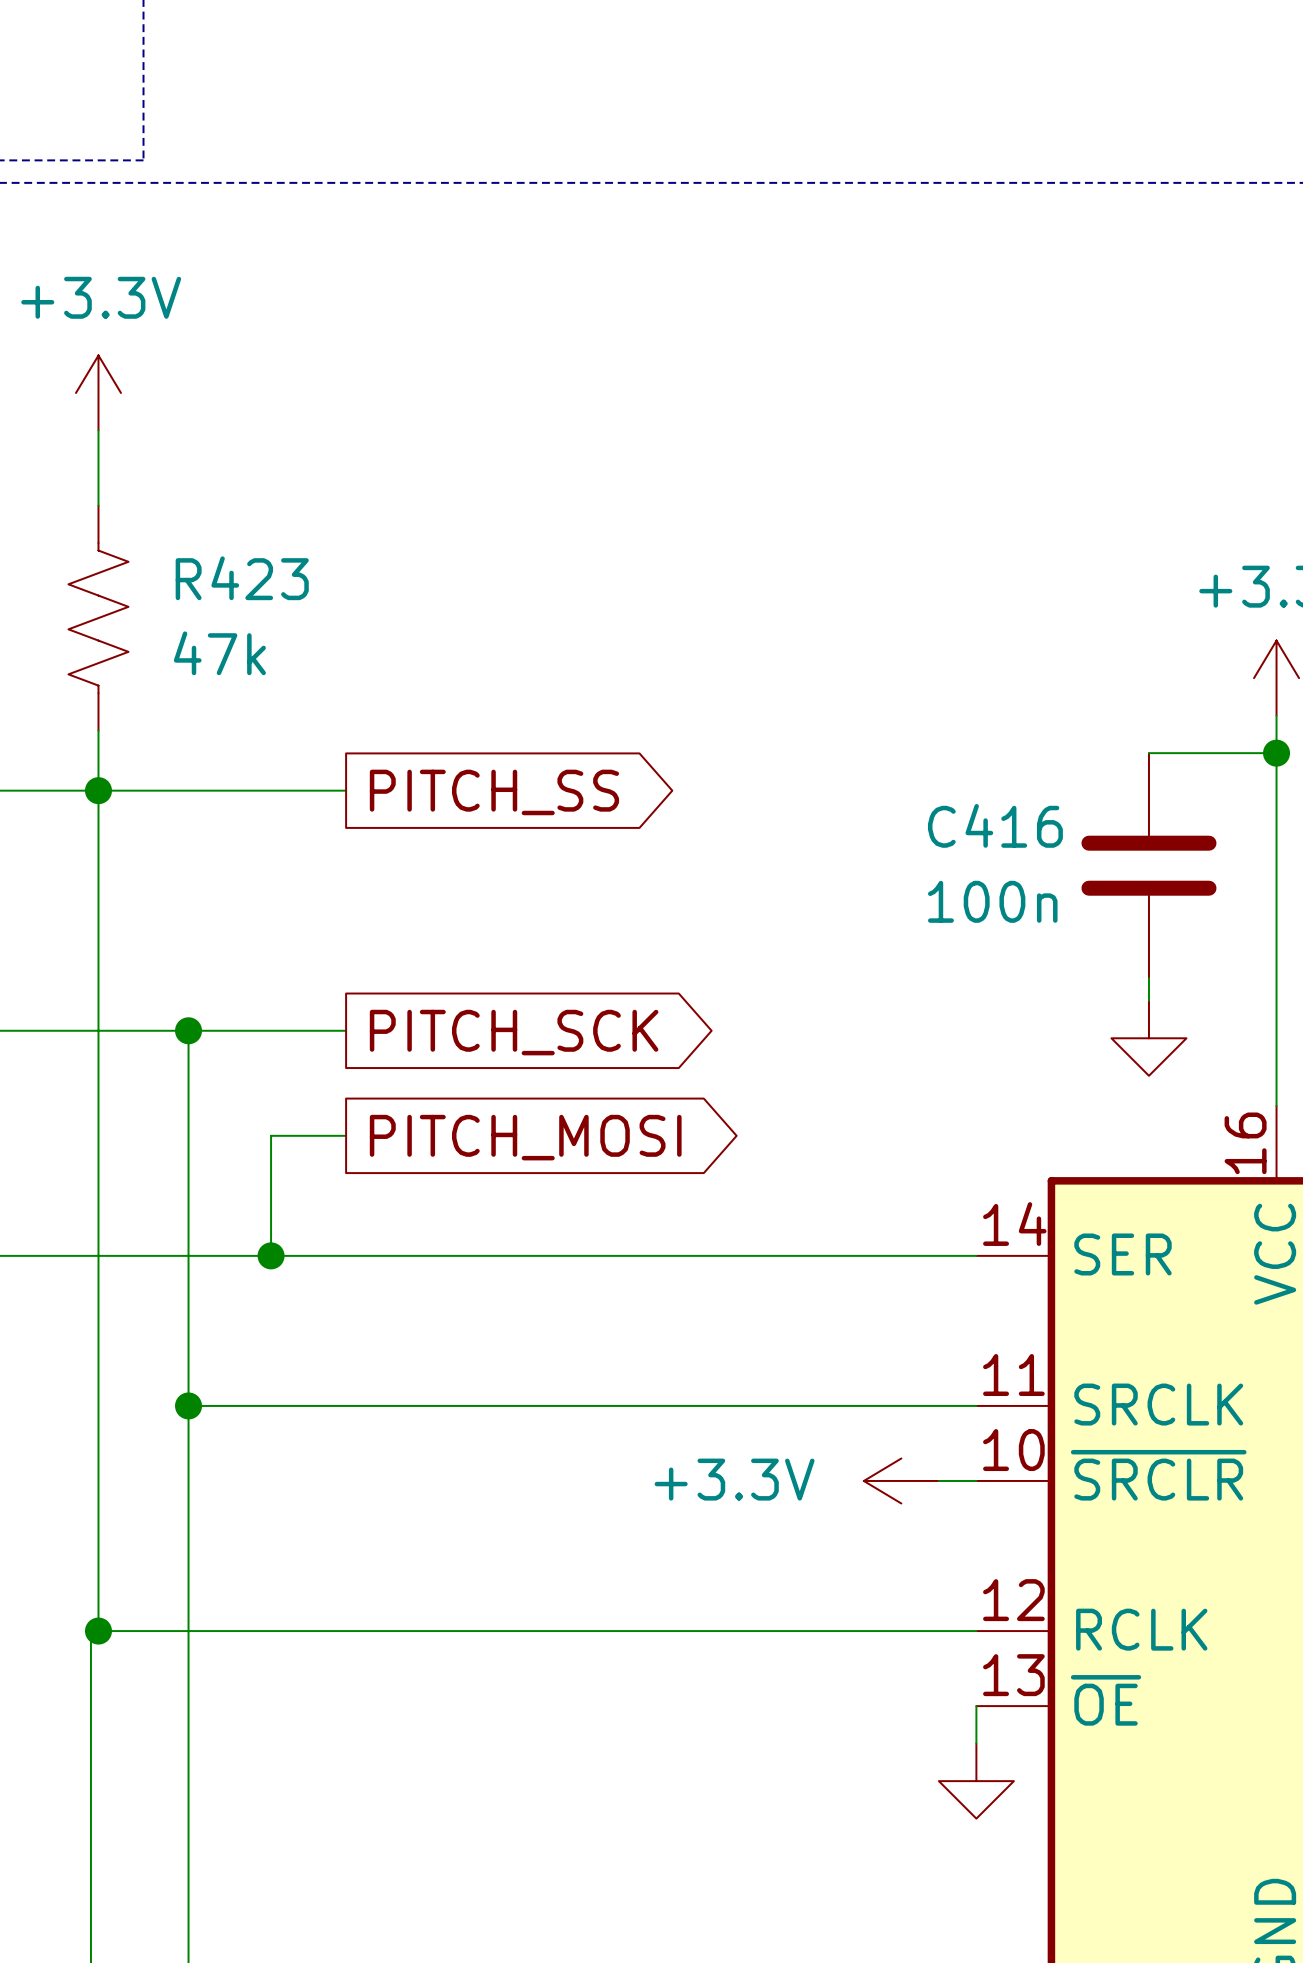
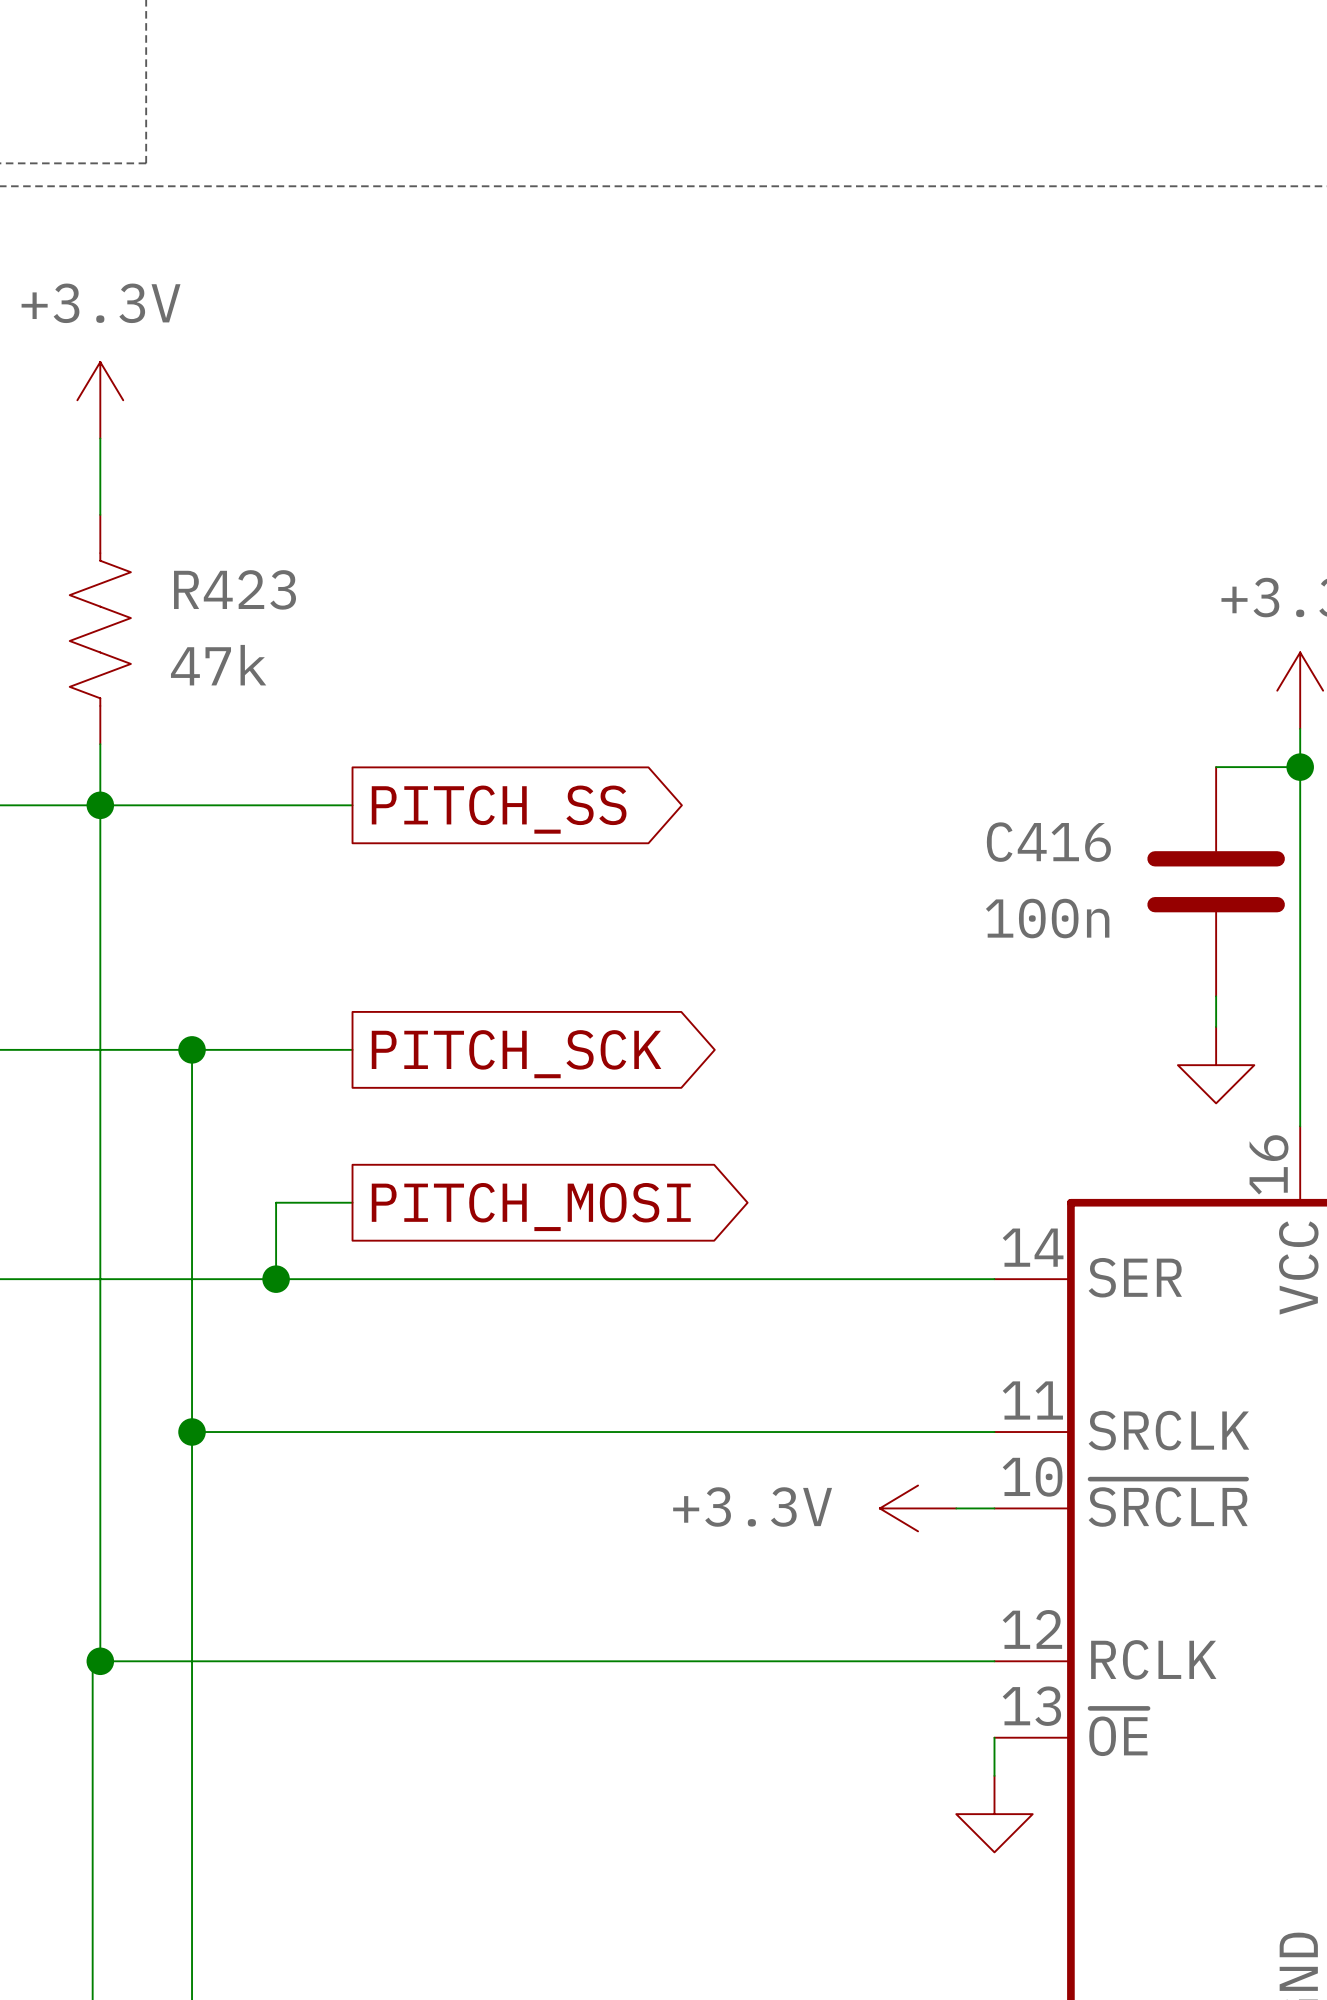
wire: (1148, 753) (1193, 753) -> none
C416 position: (1148, 865) -> (1216, 881)
wire: (1148, 978) (1148, 1000) -> none
wire: none -> (1216, 996) (1216, 1026)
power symbol position: (1148, 1038) -> (1216, 1065)
wire: (346, 1135) (271, 1135) (271, 1180) -> (352, 1202) (276, 1202)
global label position: PITCH_MOSI (525, 1137) -> PITCH_MOSI (531, 1207)

